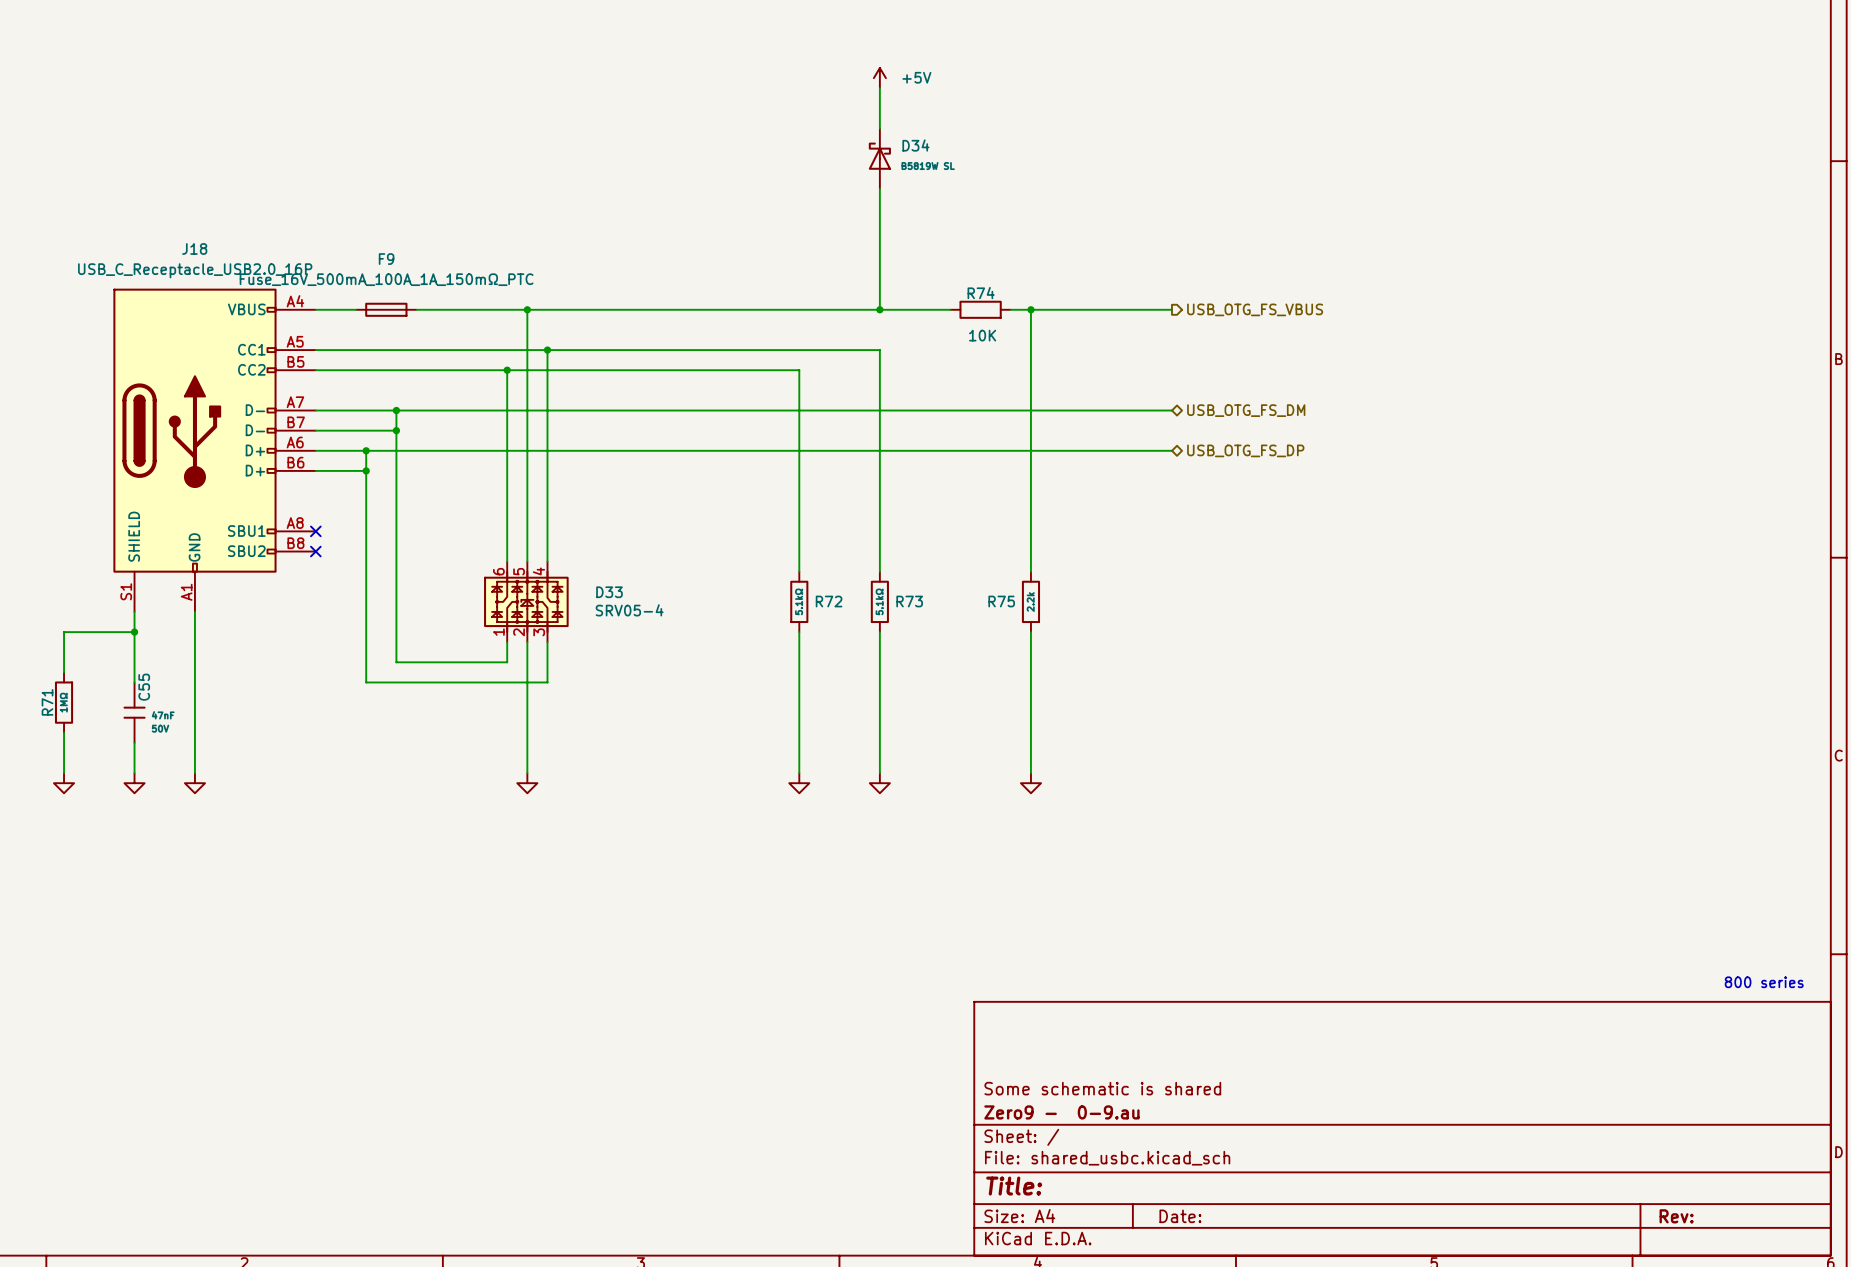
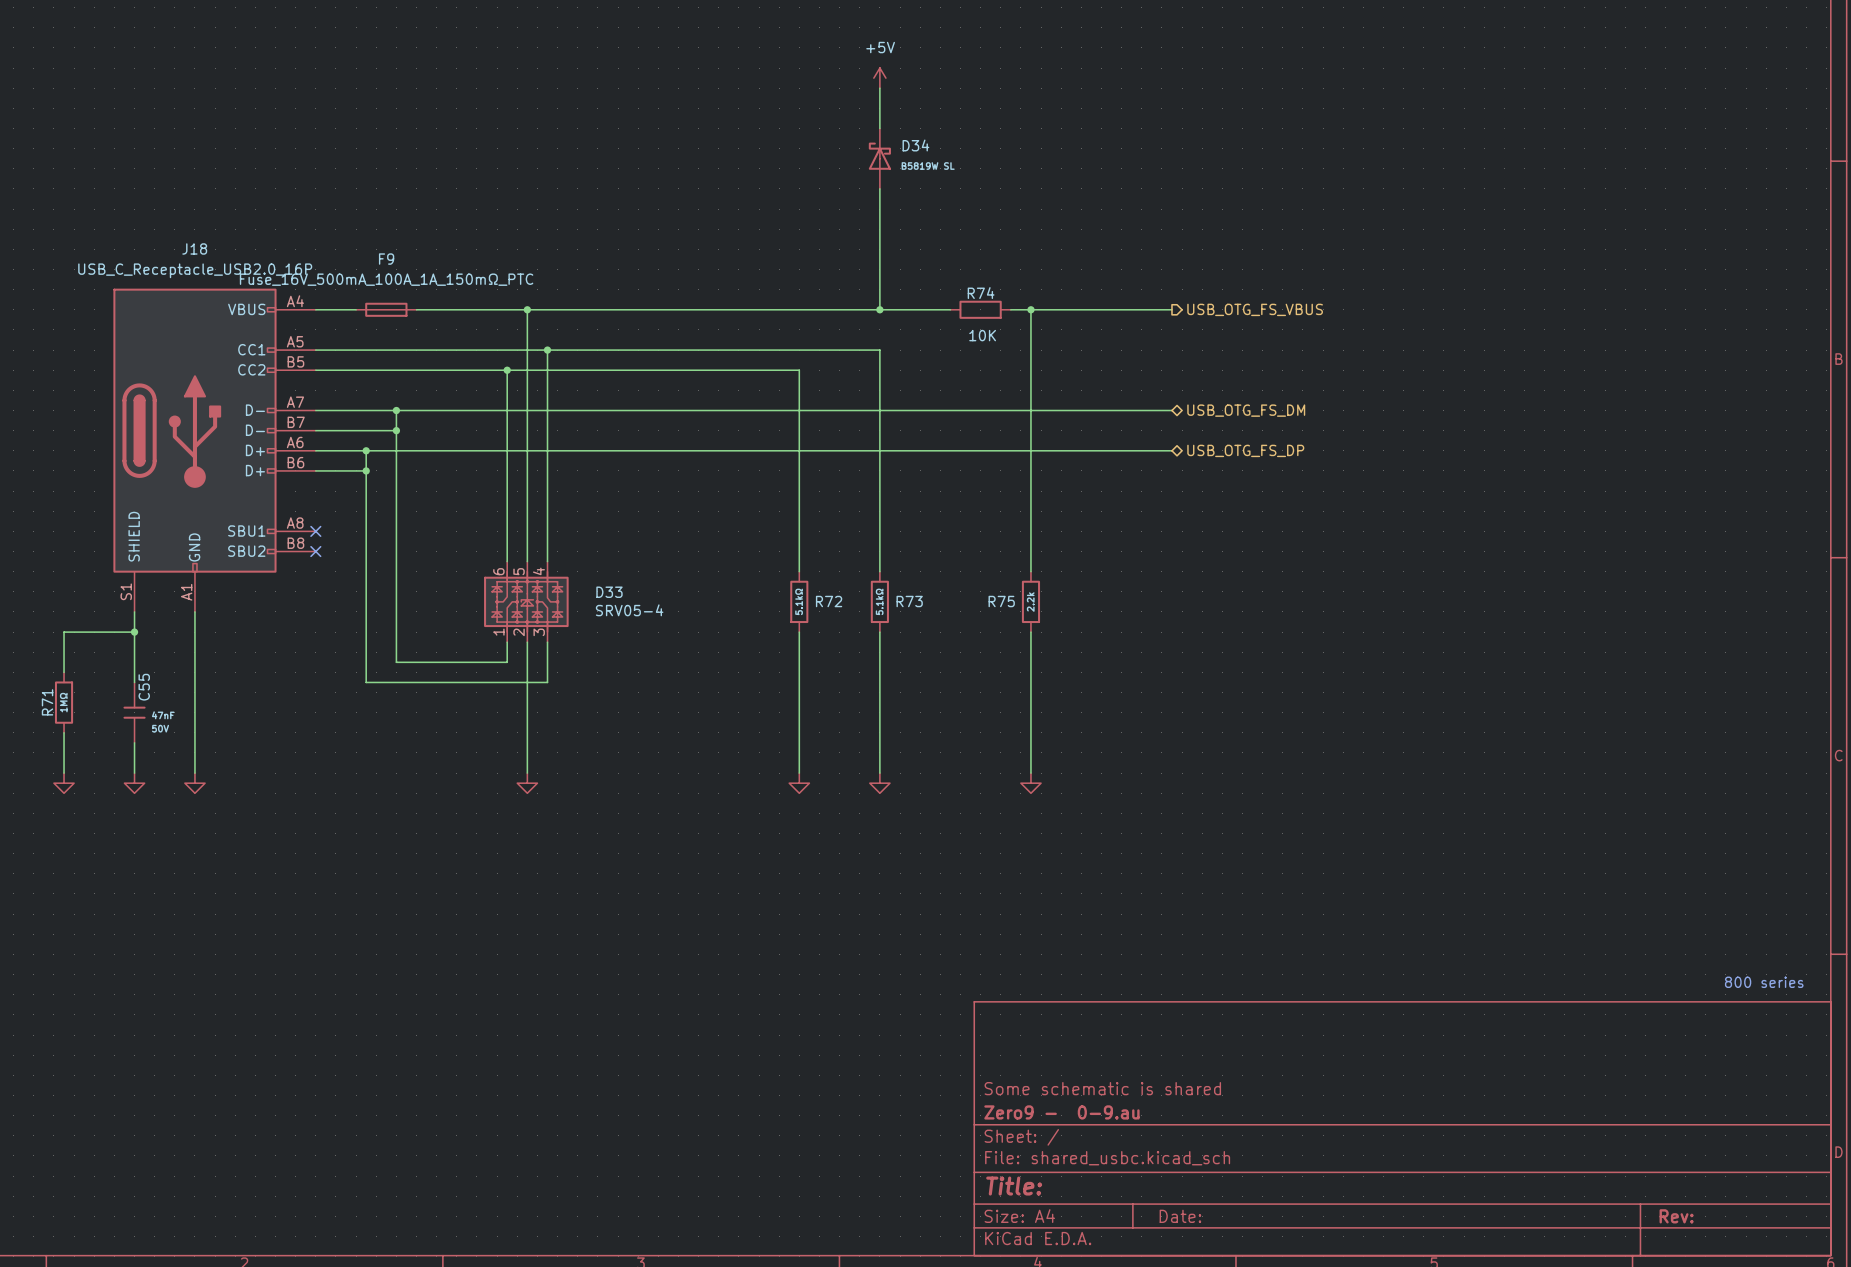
power symbol text position: +5V (916, 77) -> +5V (880, 47)

